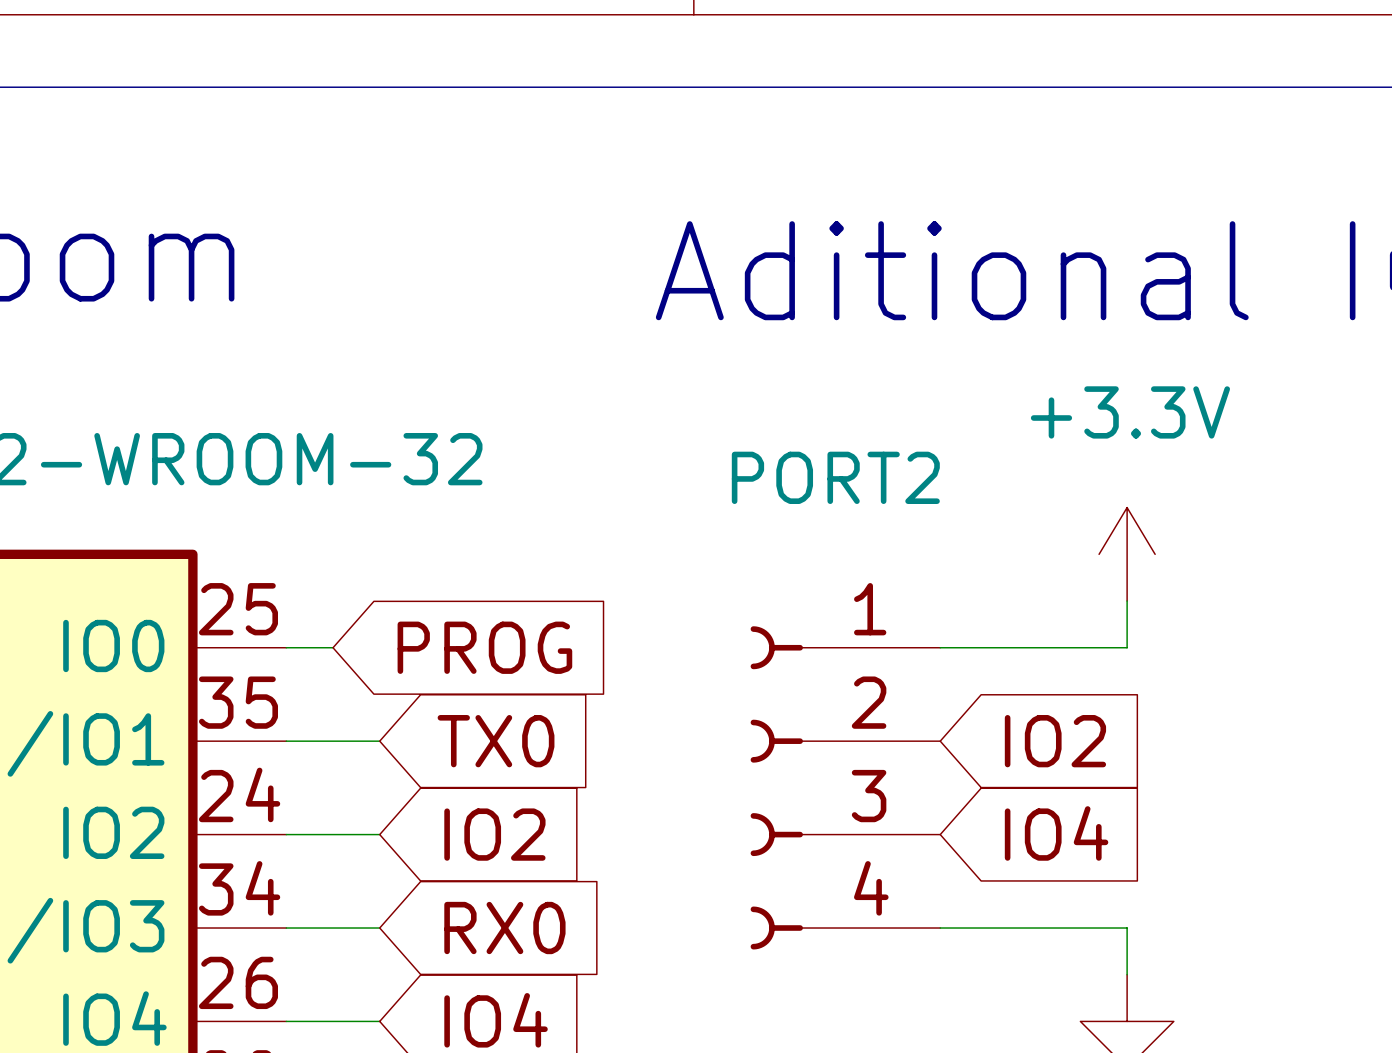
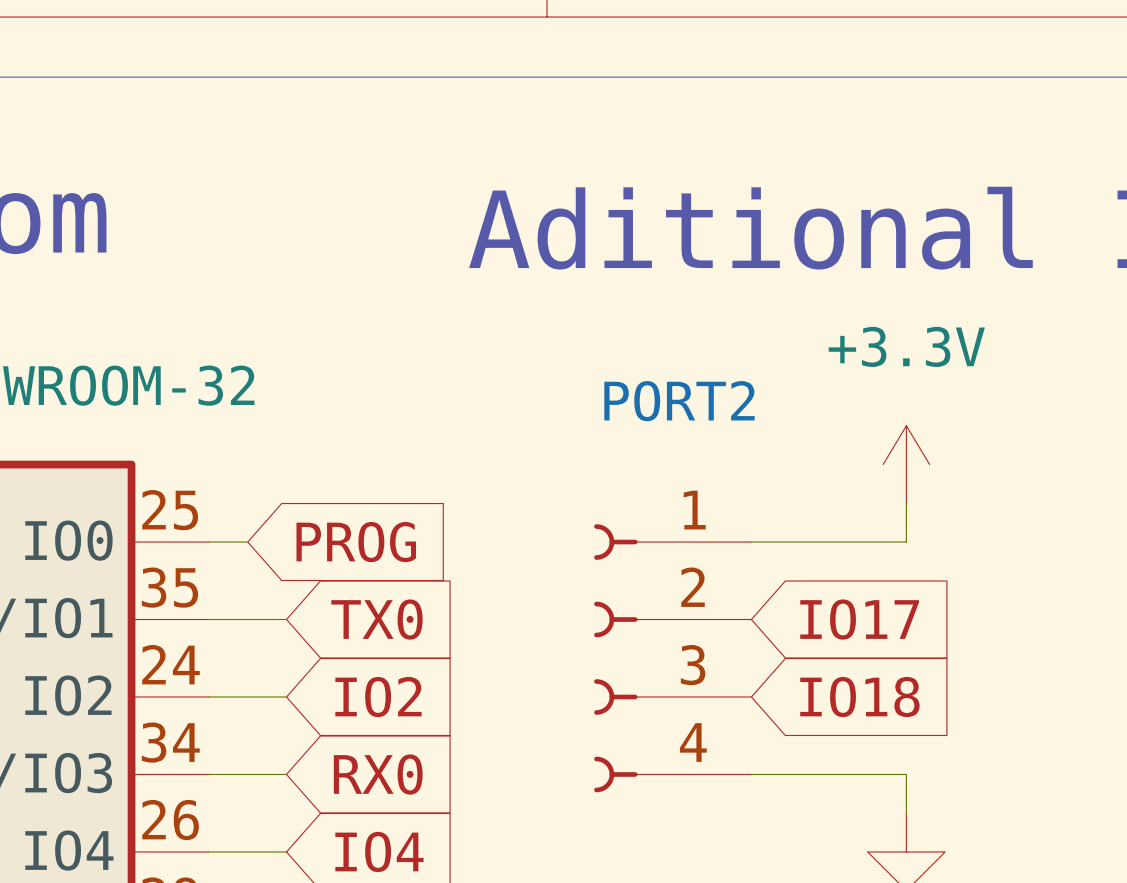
global label: IO2 (1055, 741) -> IO17 (859, 619)
global label: IO4 (1056, 833) -> IO18 (859, 697)

